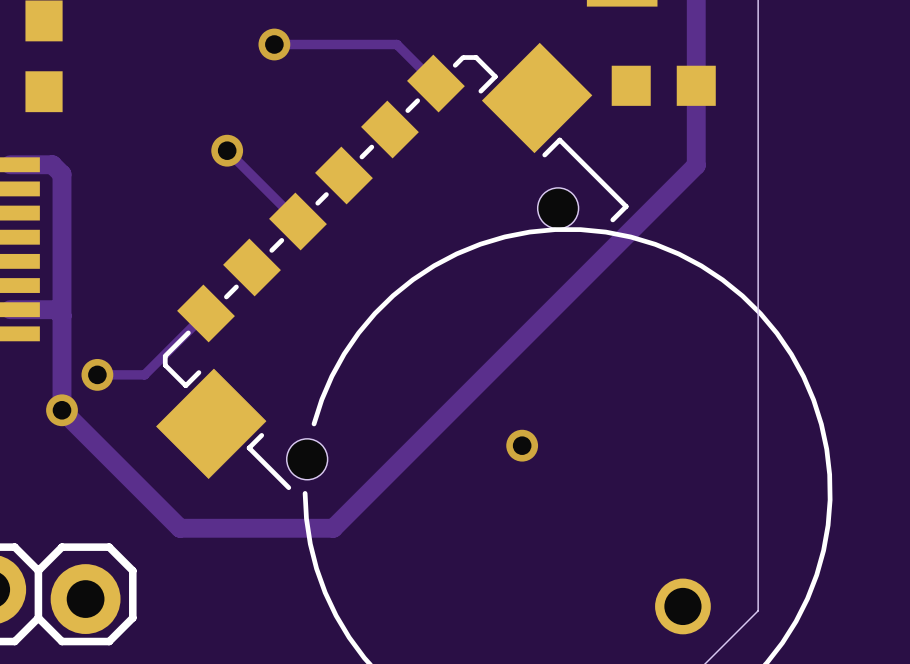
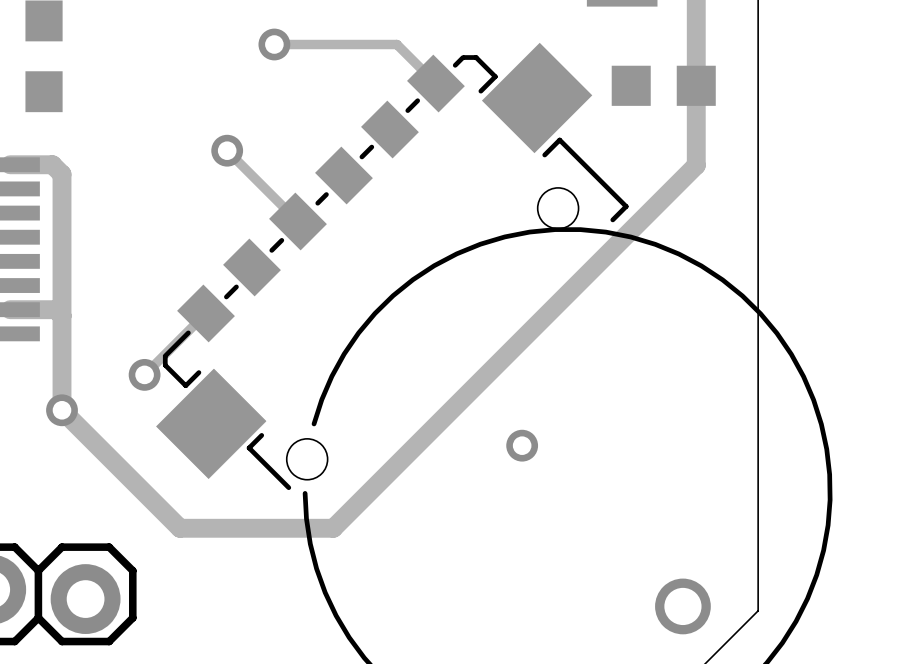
track: (97, 374) (144, 374) -> none
via position: (97, 374) -> (144, 374)

